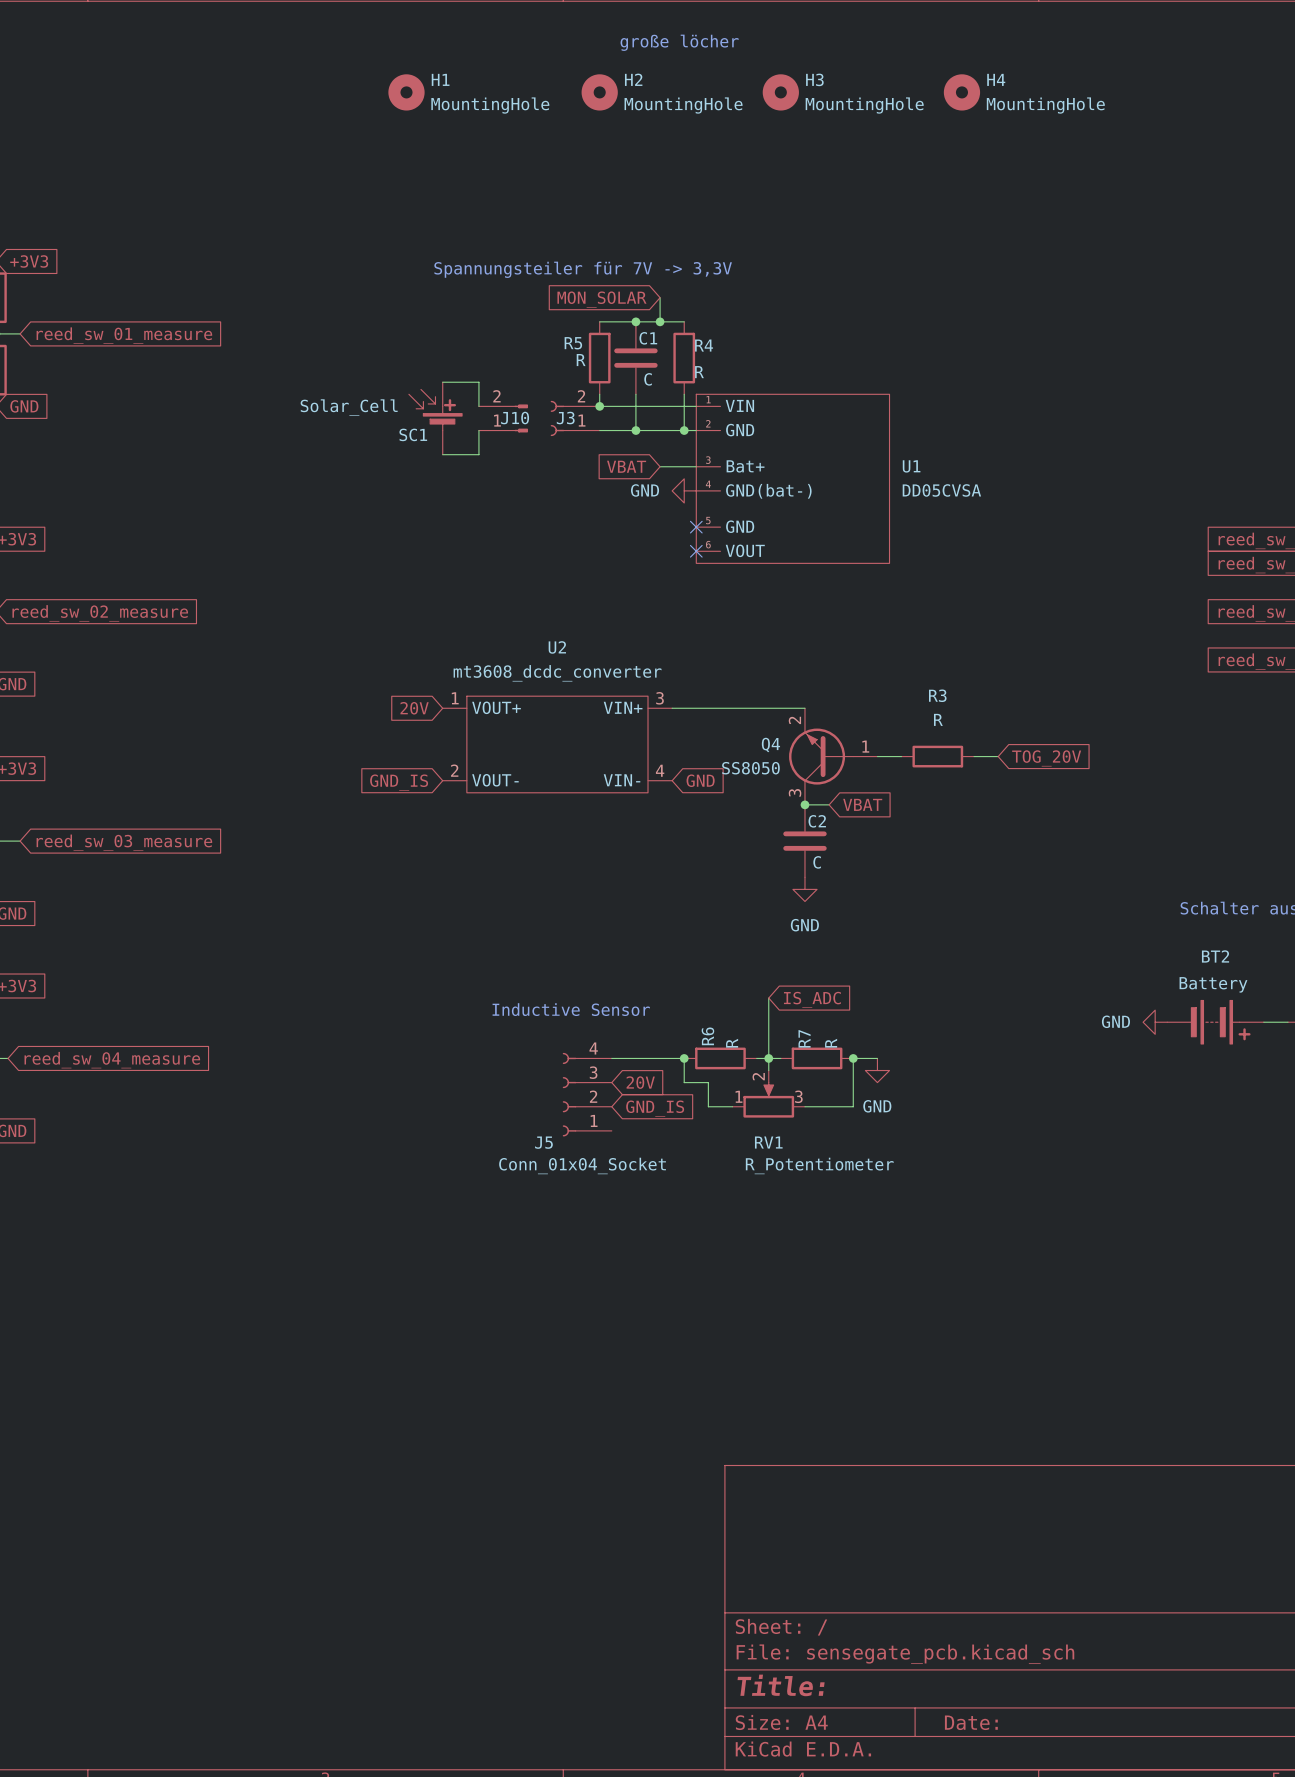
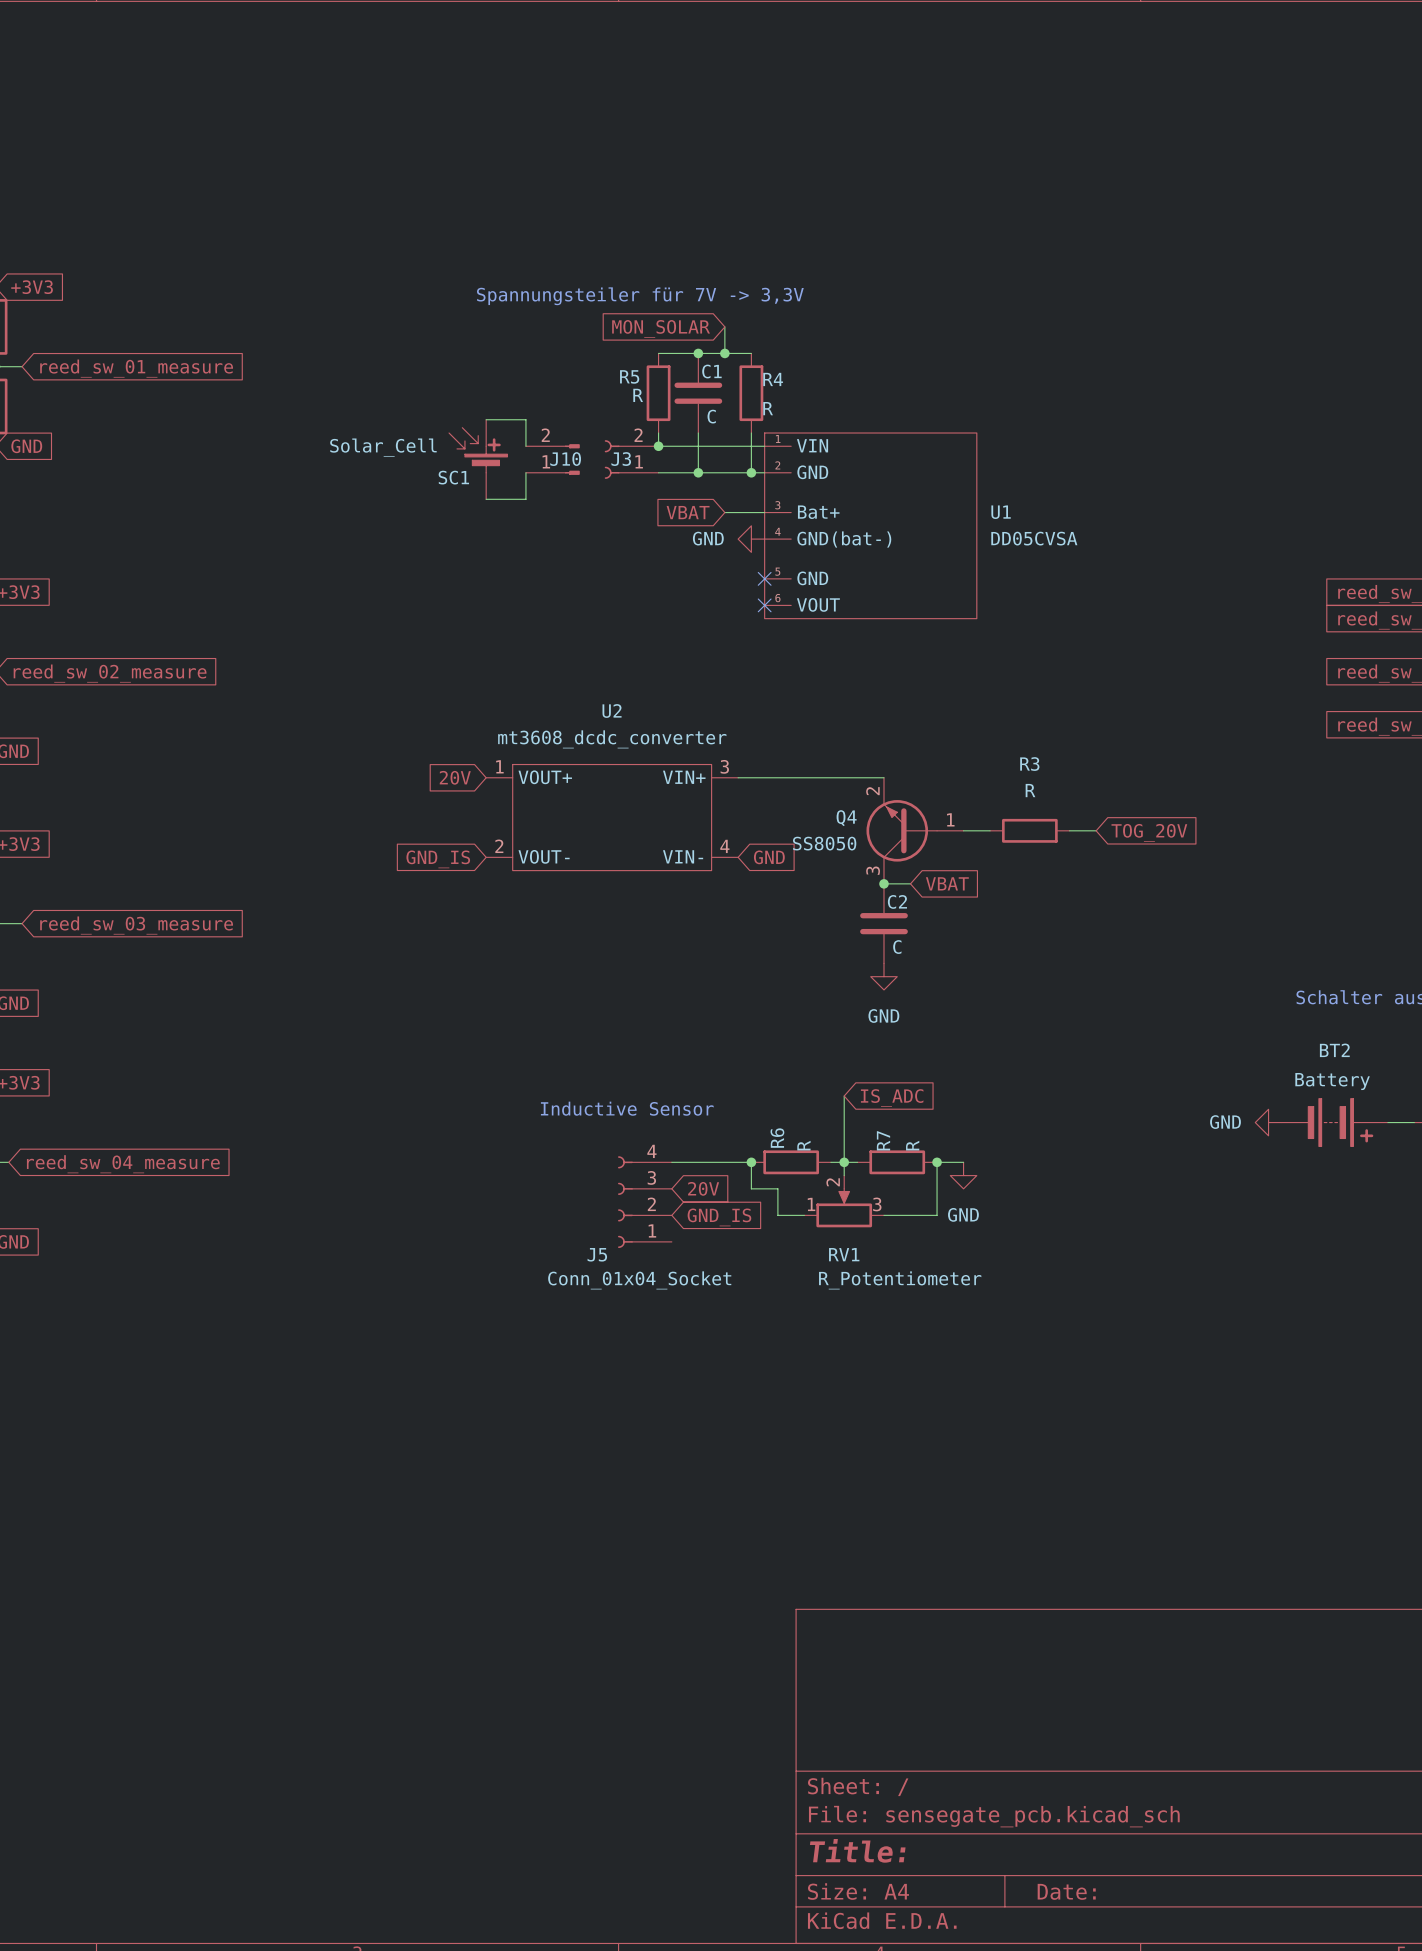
text: große löcher (679, 42) -> none
H1: MountingHole (406, 92) -> none
H2: MountingHole (599, 92) -> none
H3: MountingHole (780, 92) -> none
H4: MountingHole (961, 92) -> none

